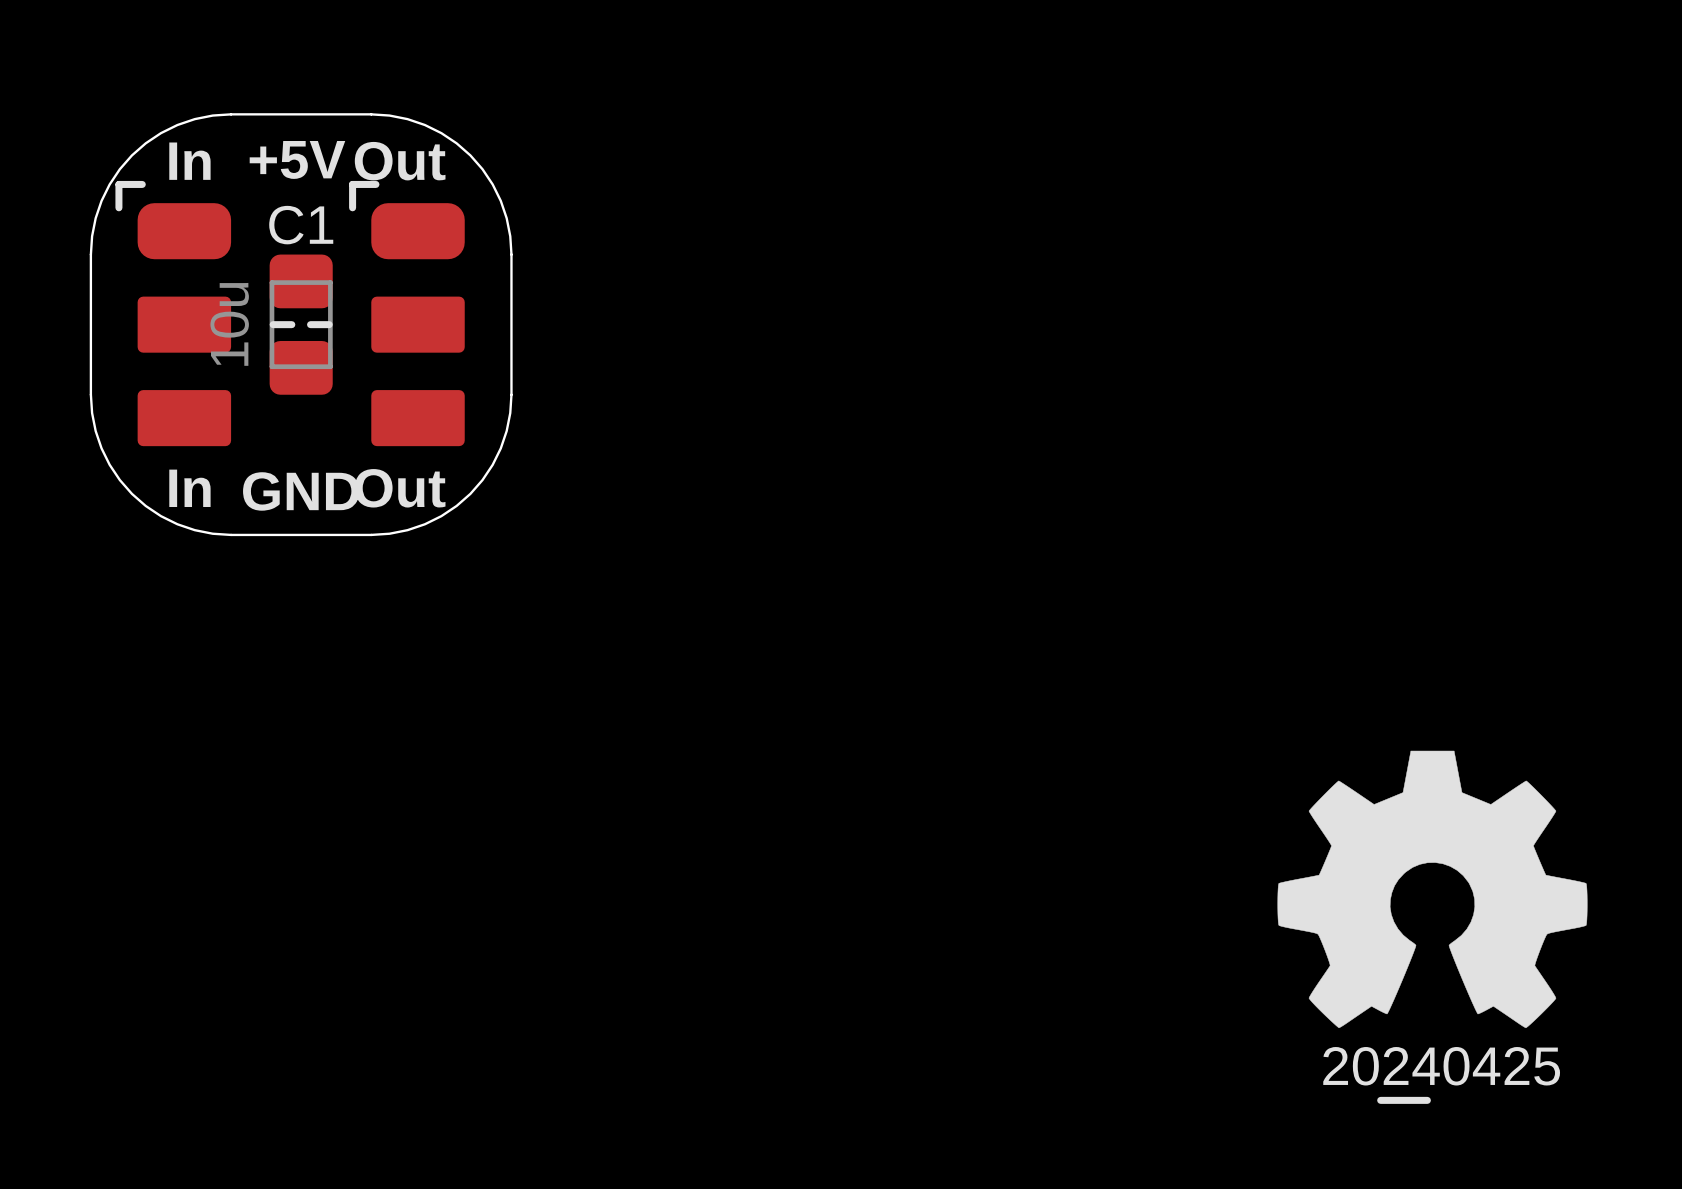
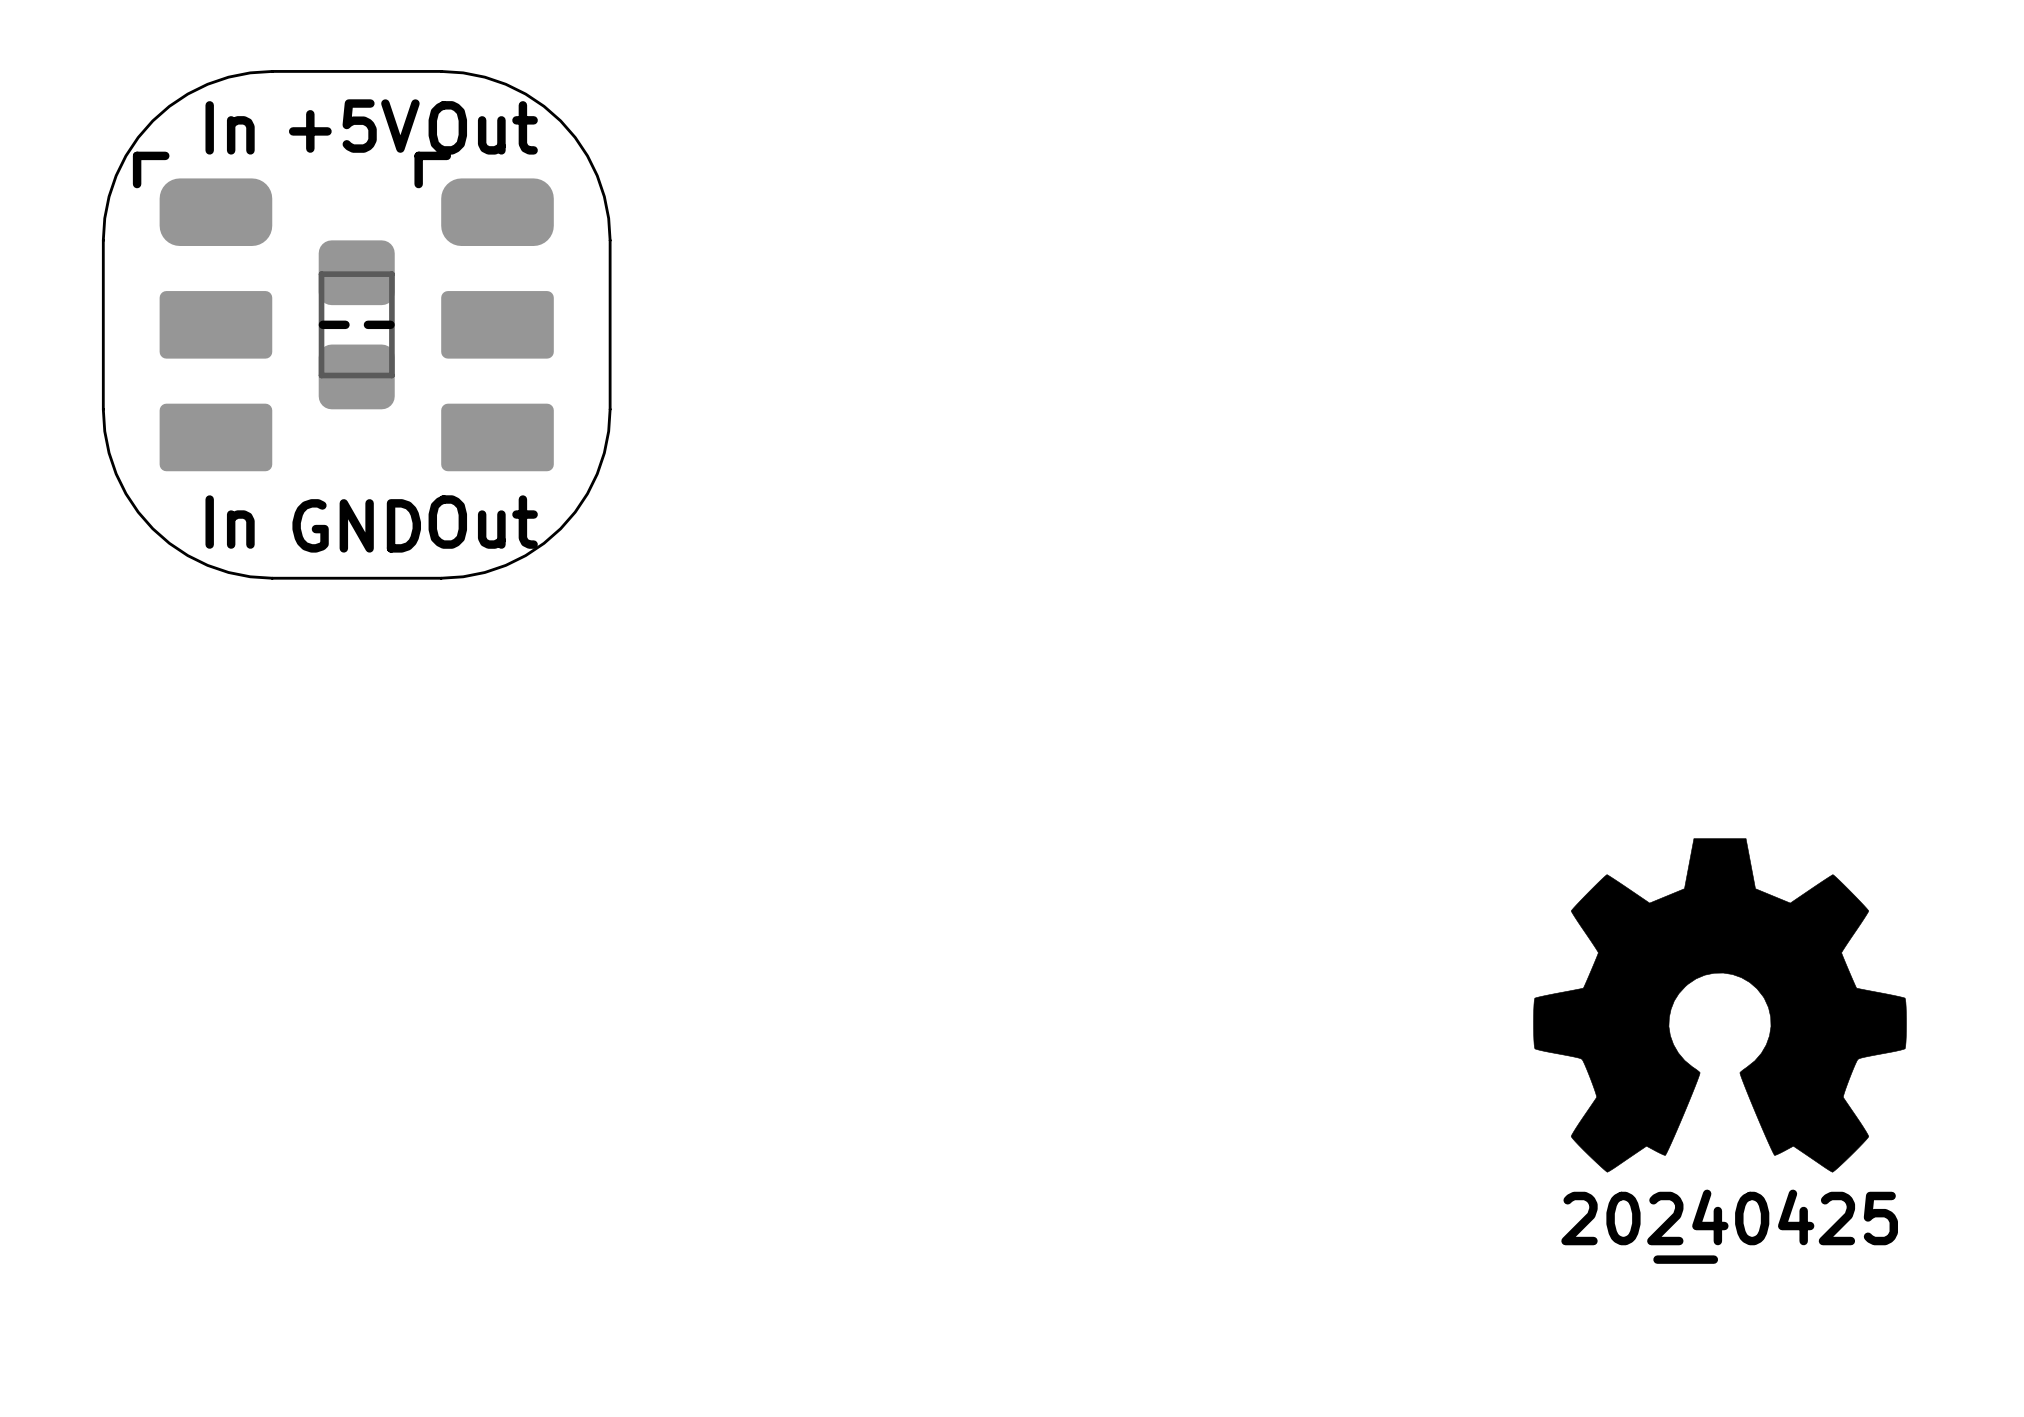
C1 name: C1 (301, 225) -> none
C1 value: 10u (229, 324) -> none

